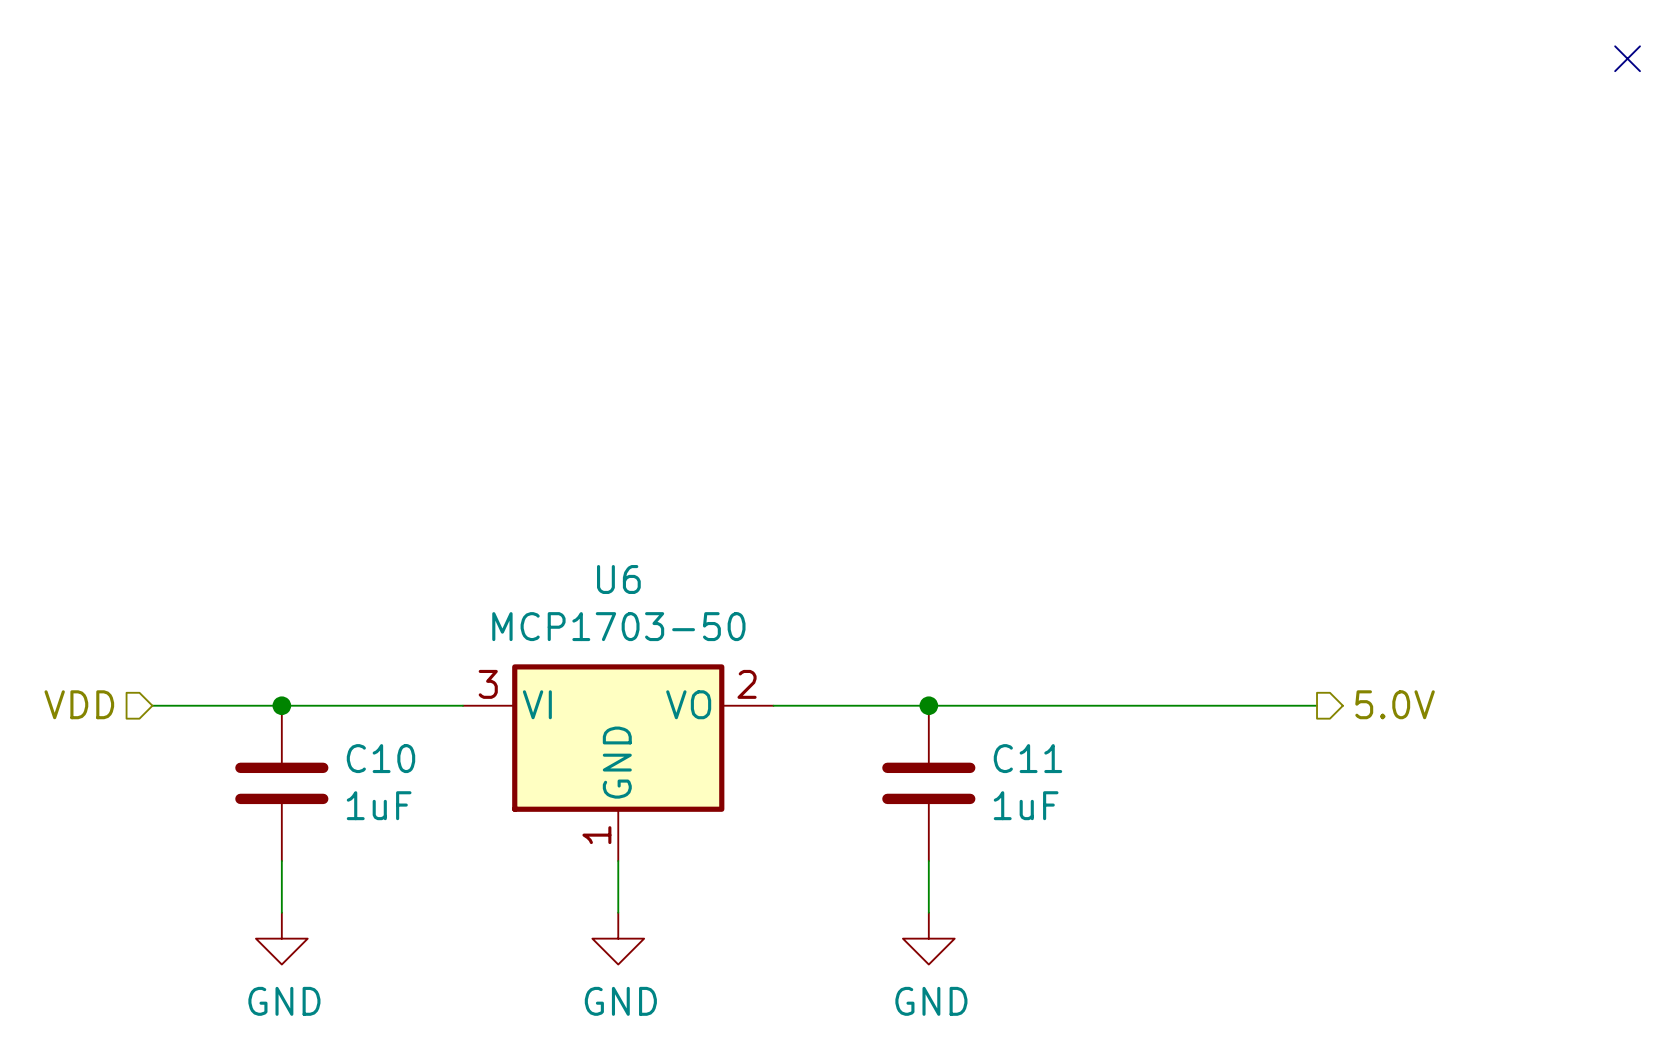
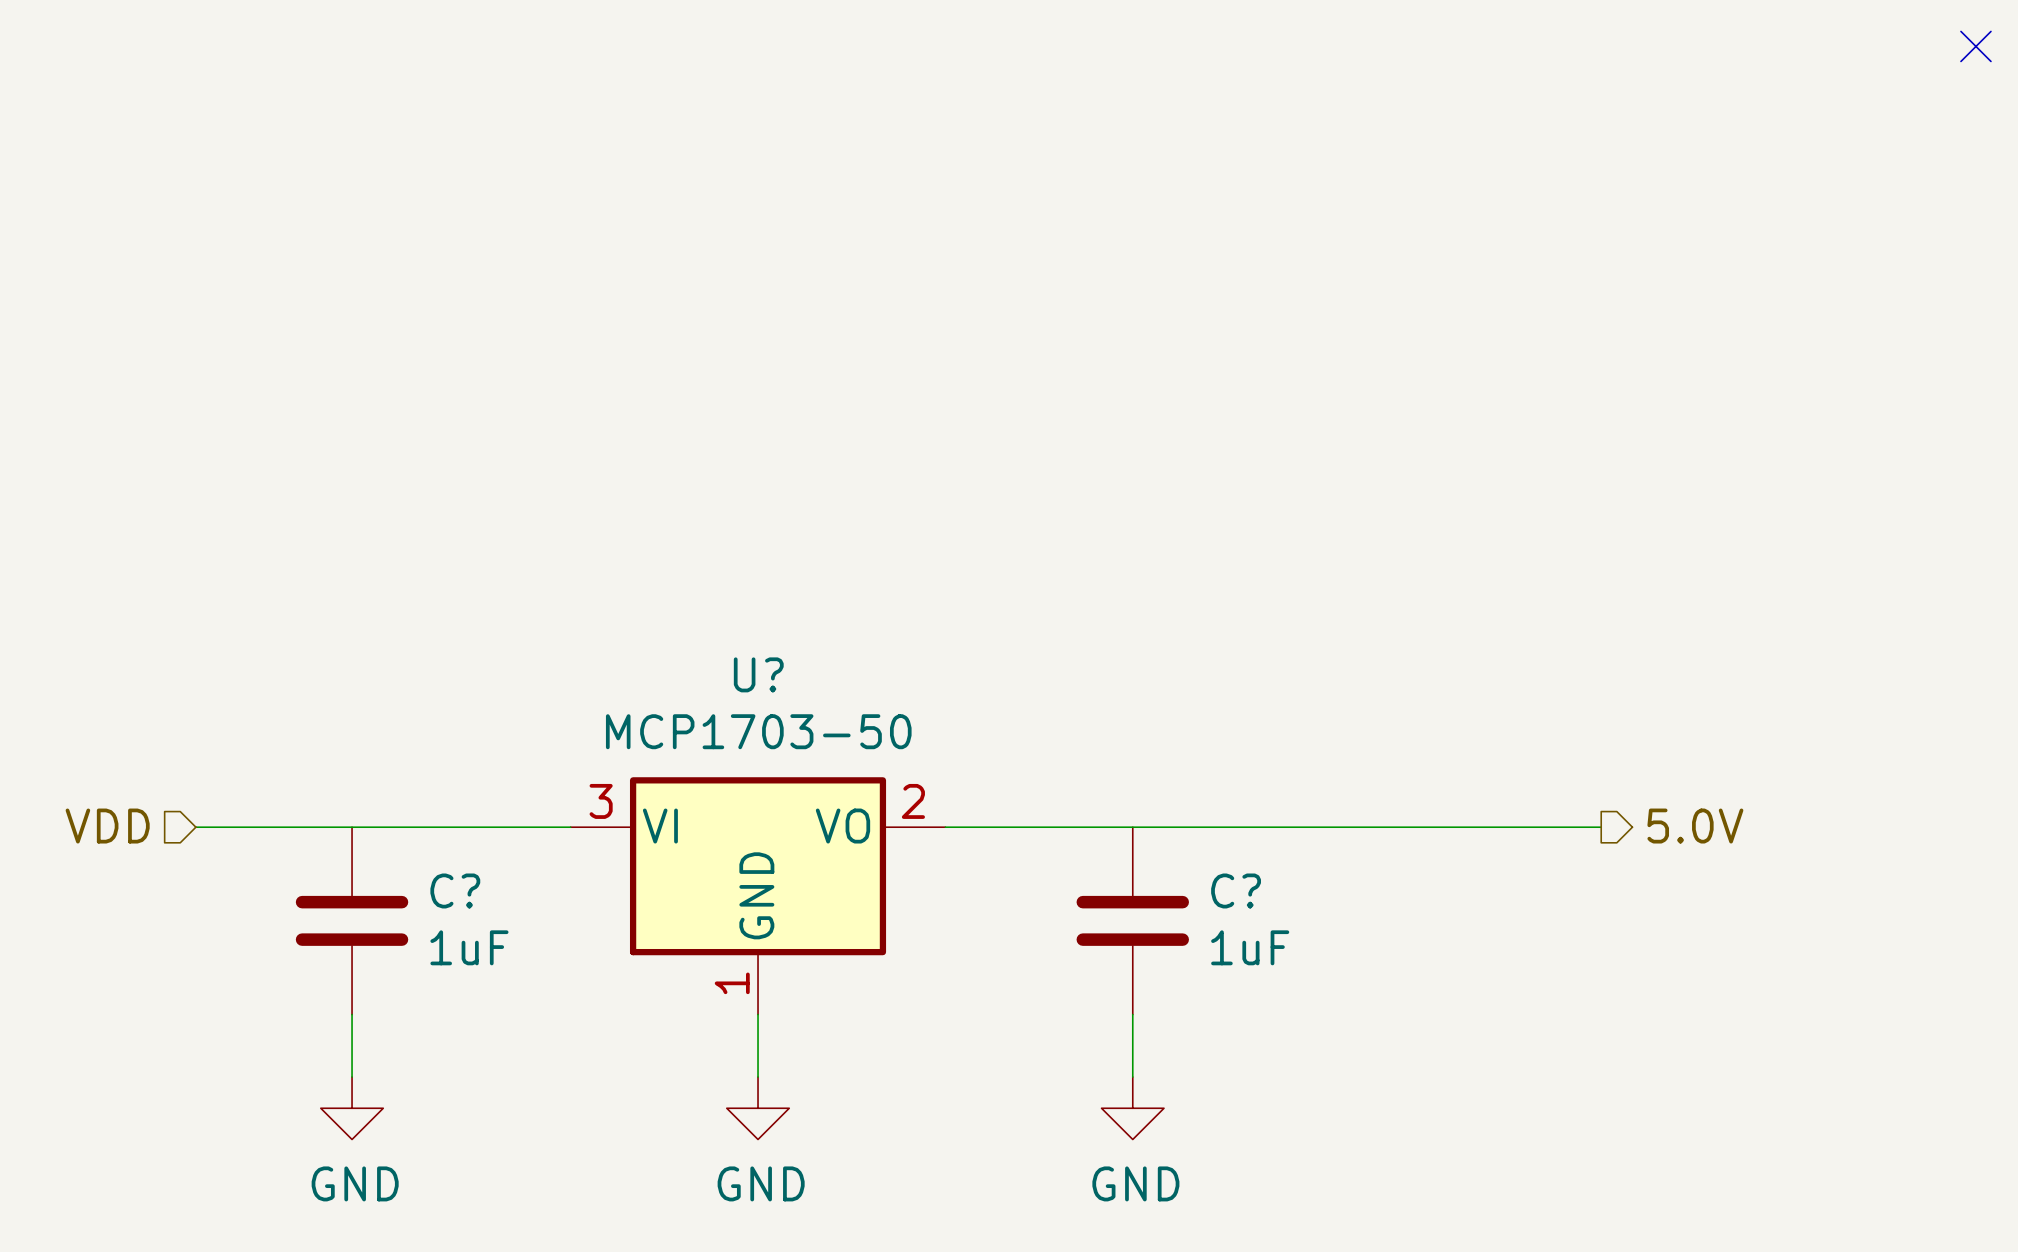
U6 name: U6 (618, 579) -> U? (758, 674)
junction: (281, 705) -> none
junction: (928, 705) -> none
C10 name: C10 (380, 758) -> C? (455, 890)
C11 name: C11 (1027, 758) -> C? (1236, 890)

